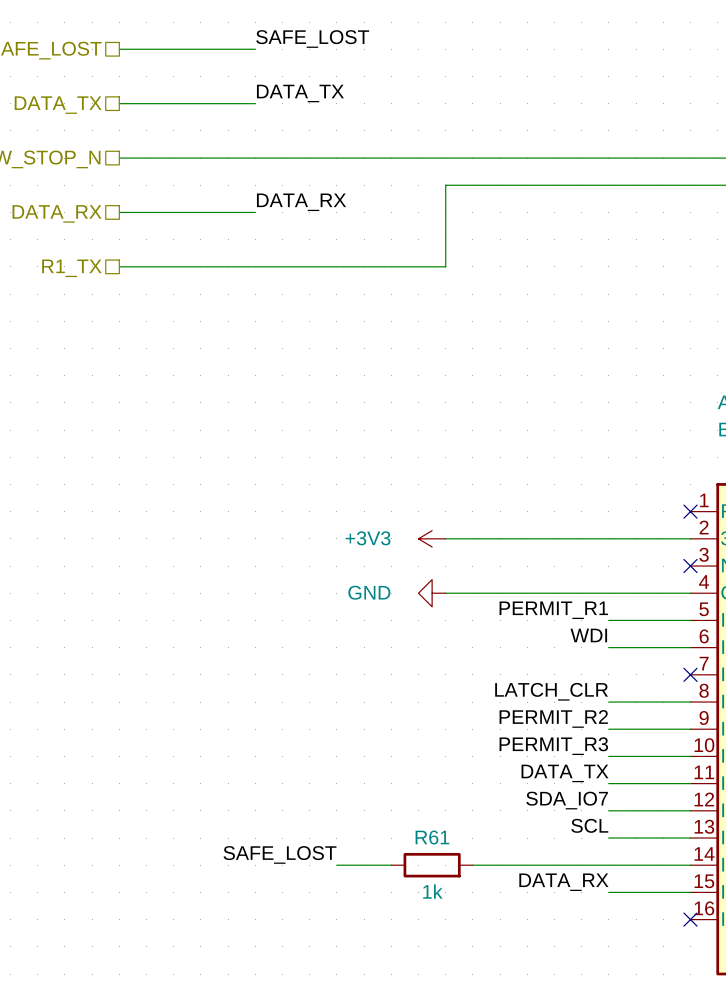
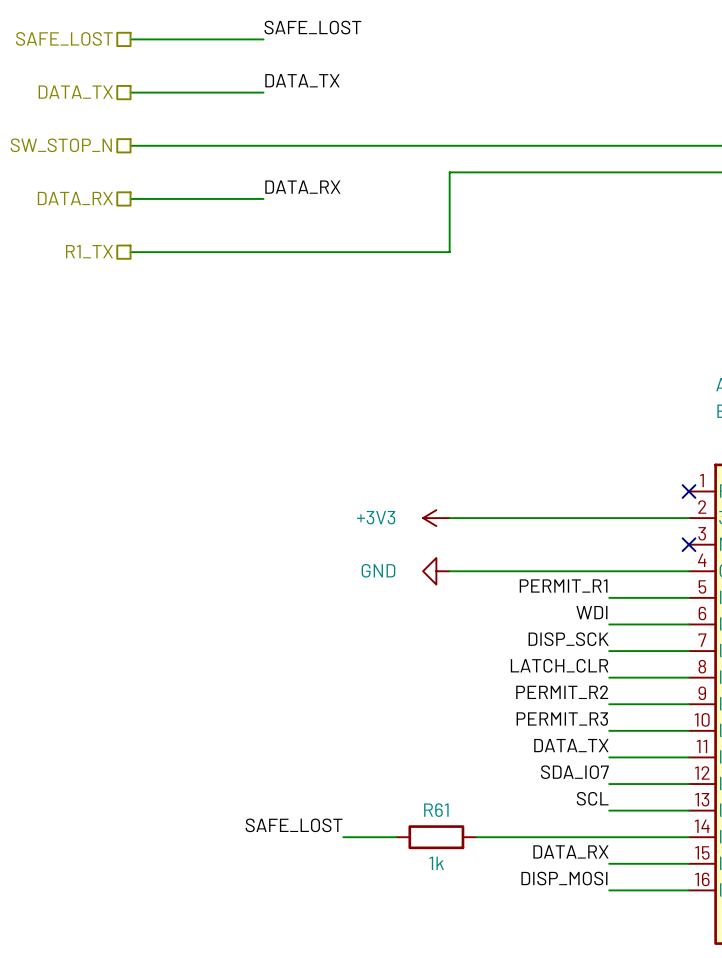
label: none -> DISP_SCK (568, 639)
wire: none -> (609, 651) (689, 651)
no-connect mark: (690, 674) -> none
label: none -> DISP_MOSI (564, 878)
wire: none -> (609, 890) (689, 890)
no-connect mark: (690, 919) -> none

